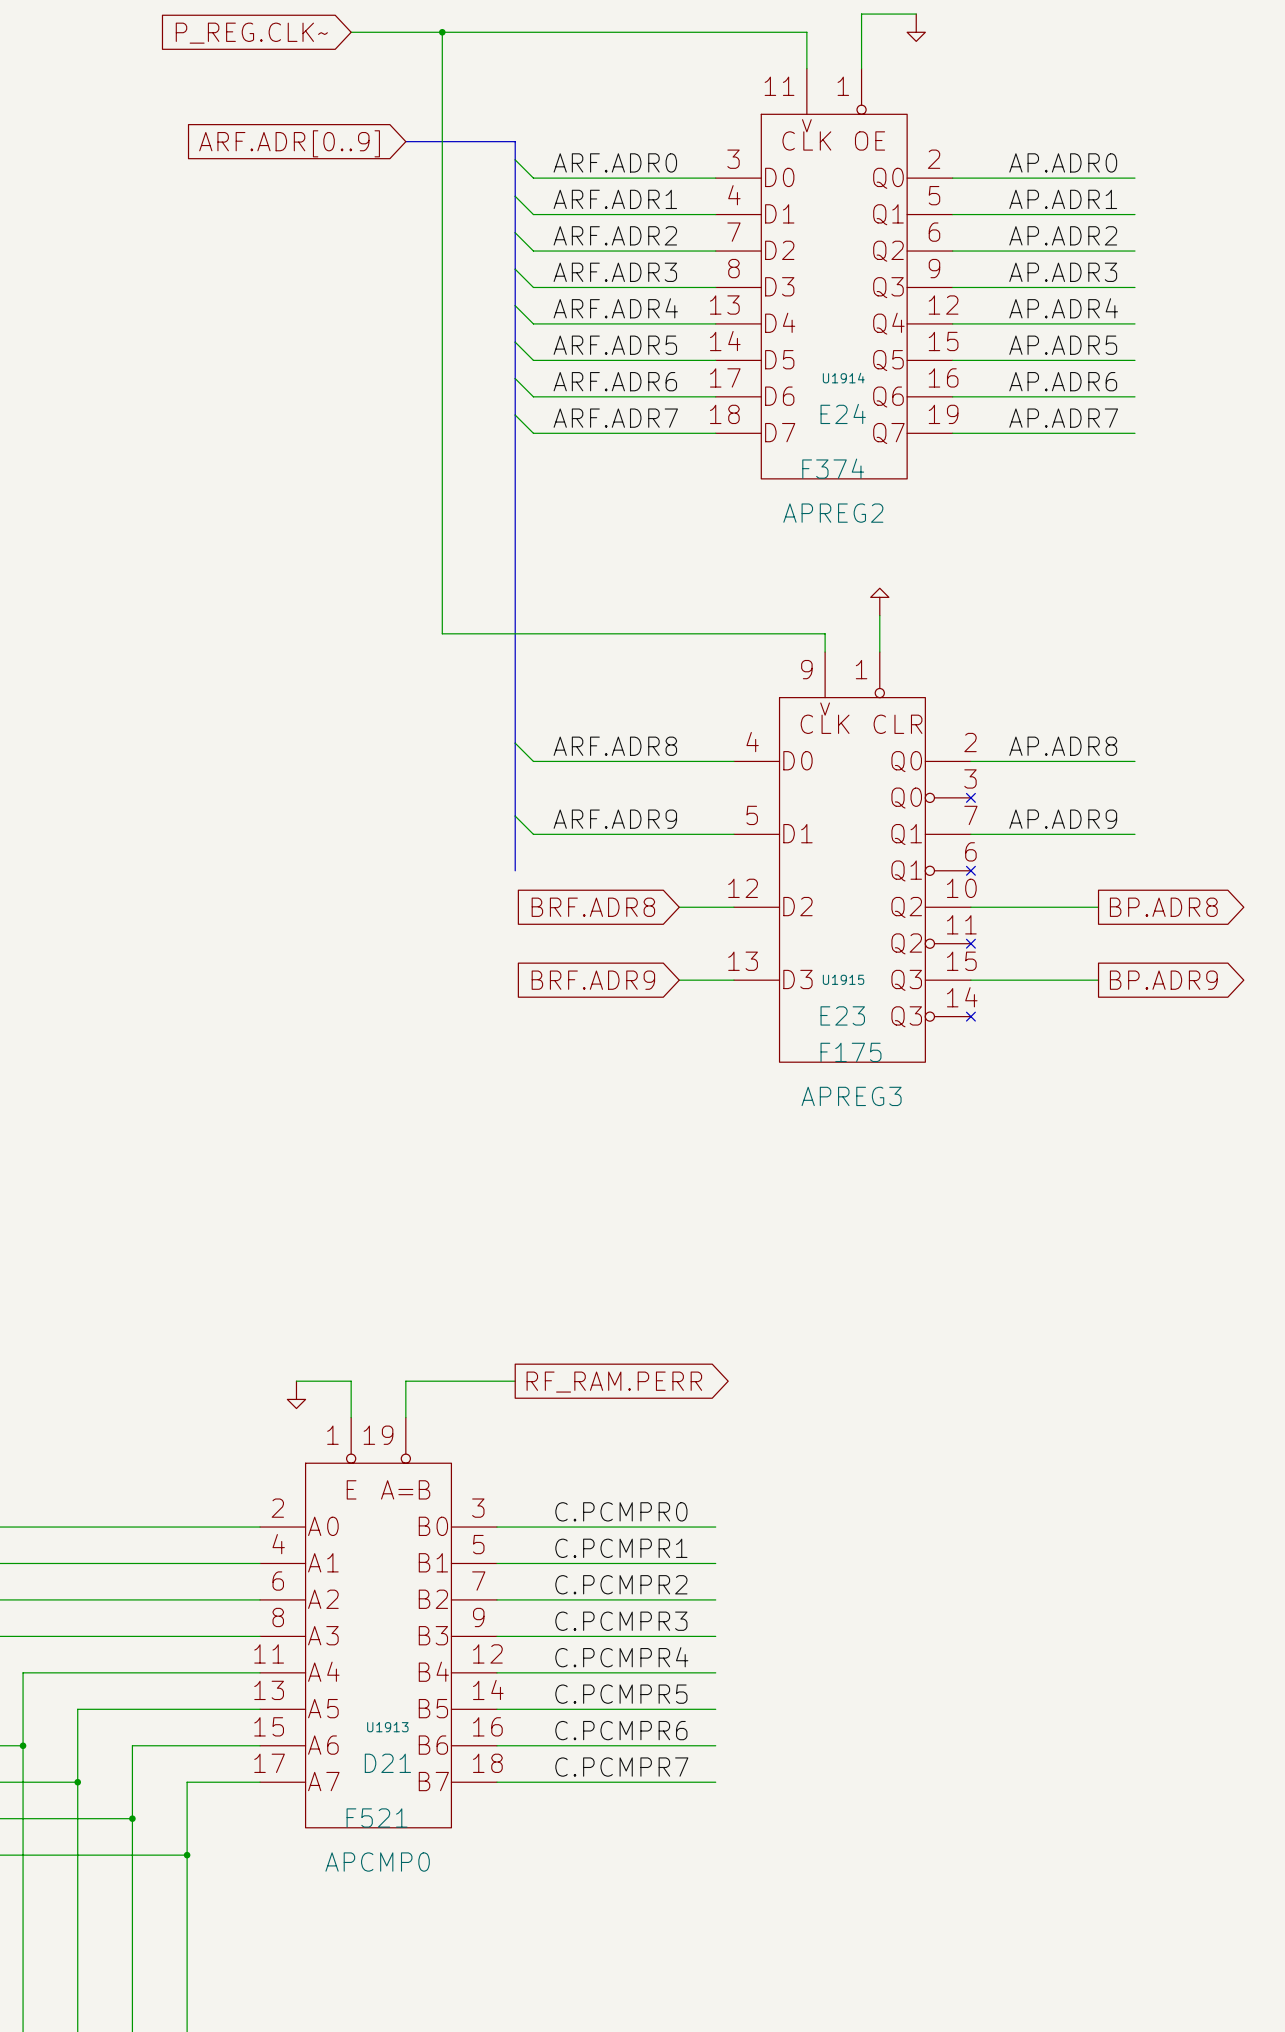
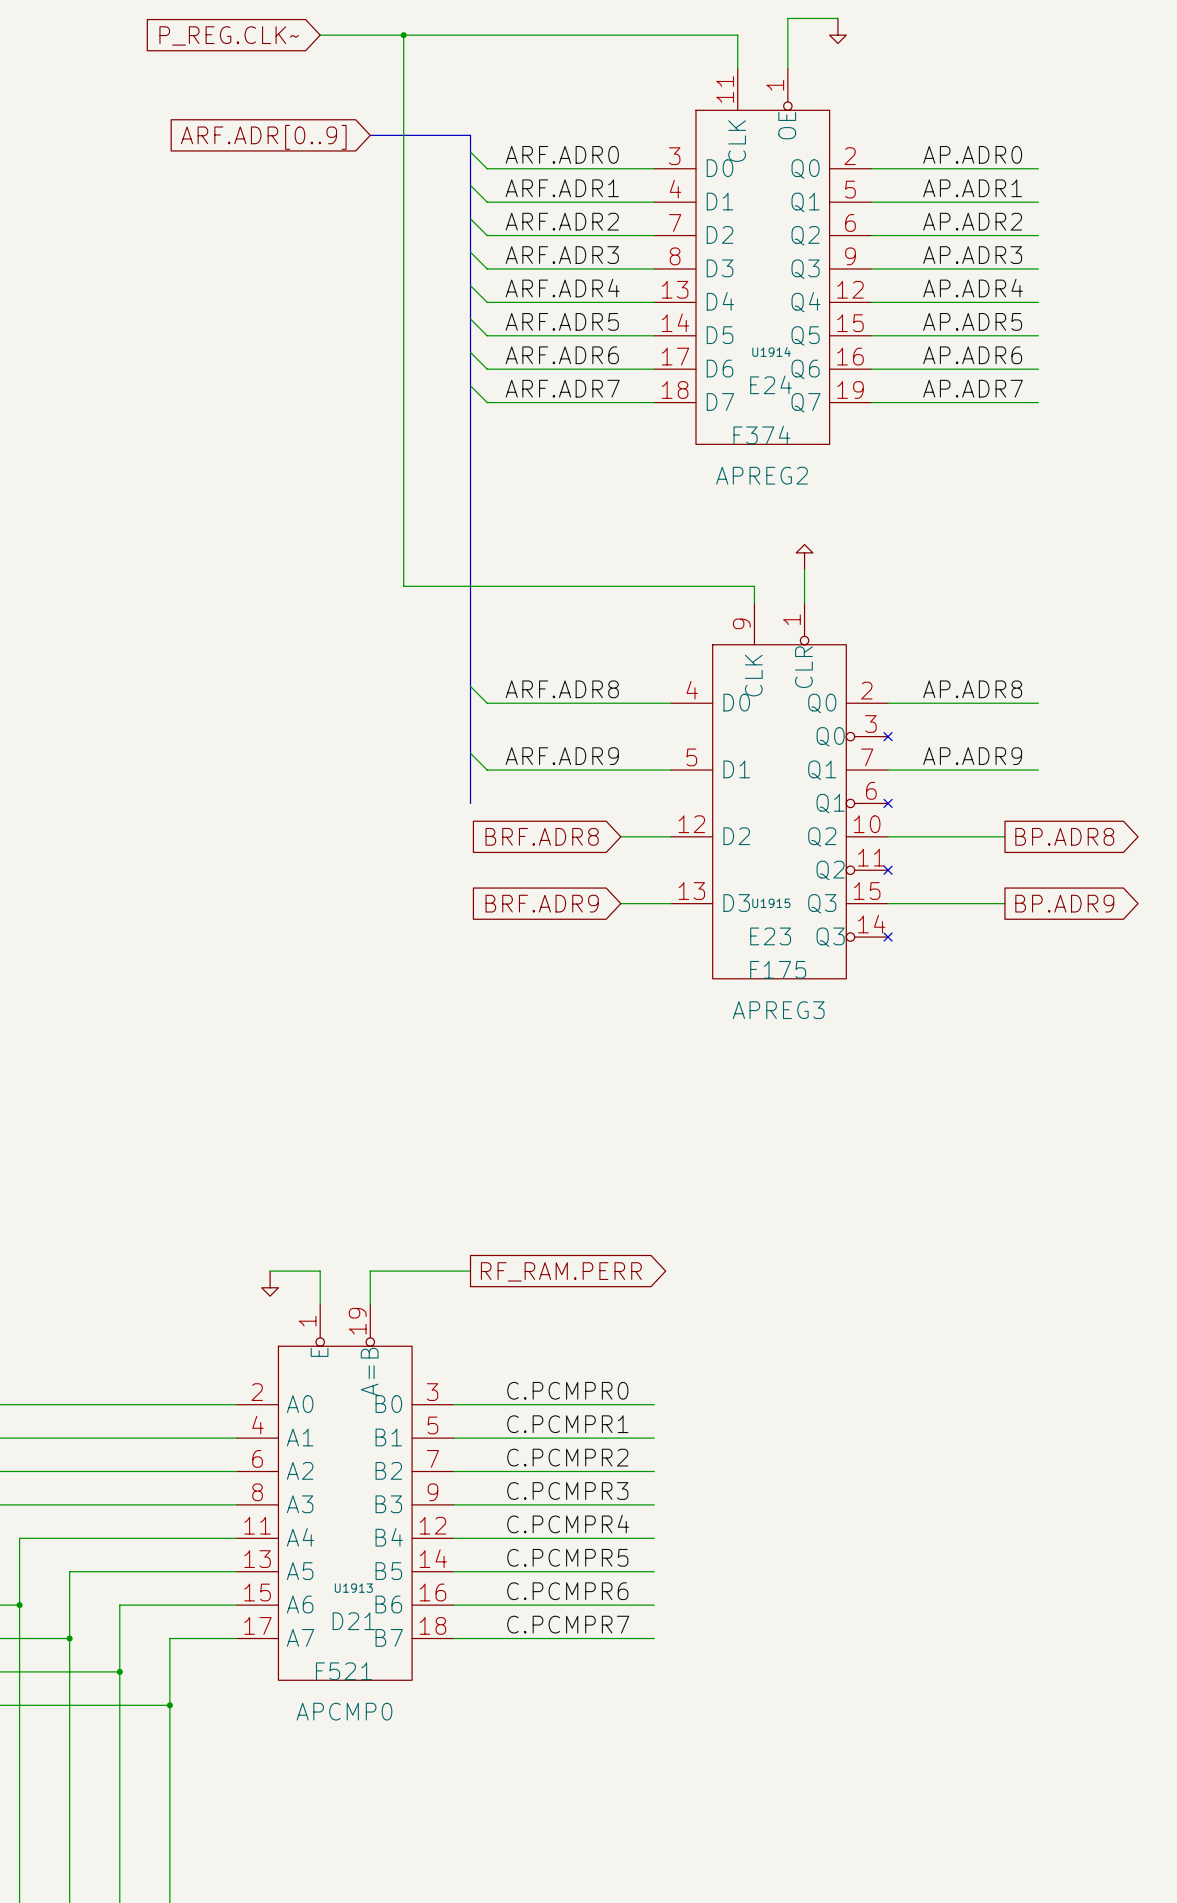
U1914 symbol: [715, 68, 953, 479] -> [654, 68, 872, 445]
U1915 symbol: [733, 652, 971, 1063] -> [670, 603, 889, 979]
U1913 symbol: [260, 1417, 497, 1828] -> [236, 1304, 454, 1681]

